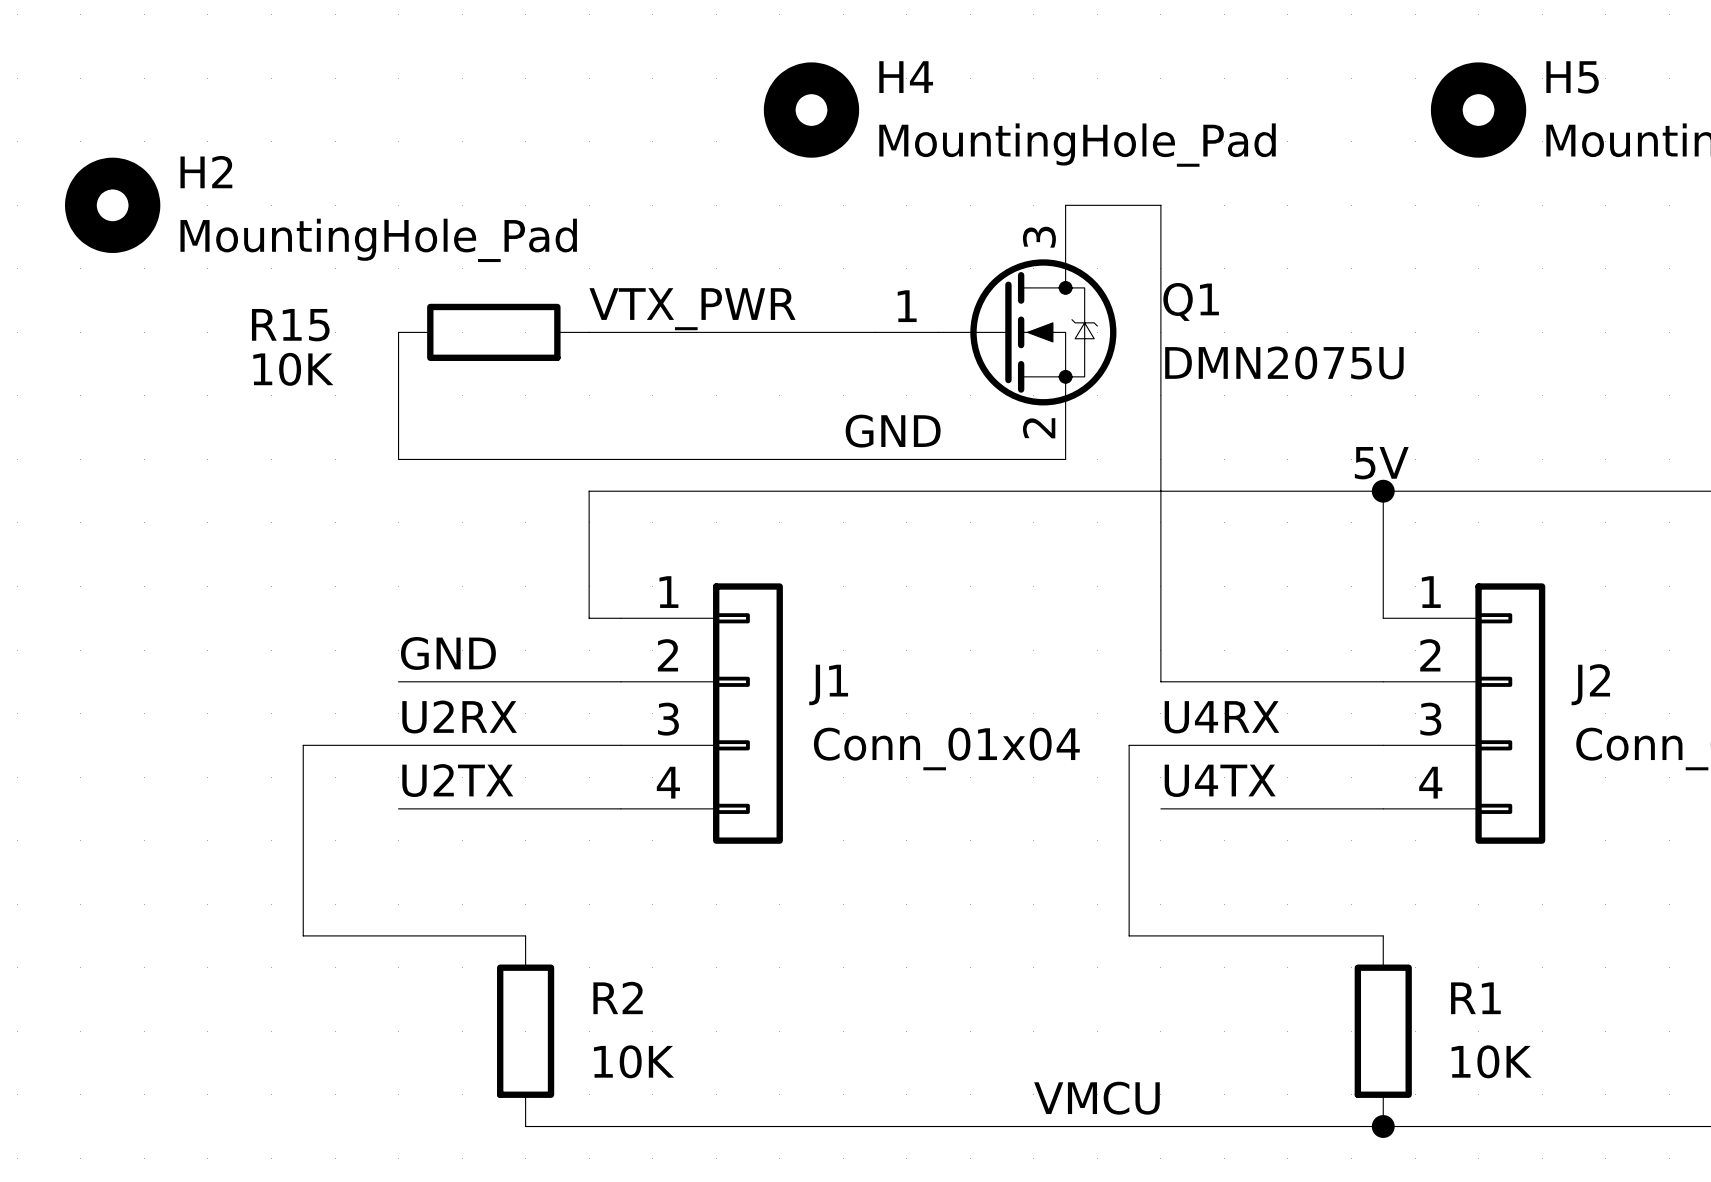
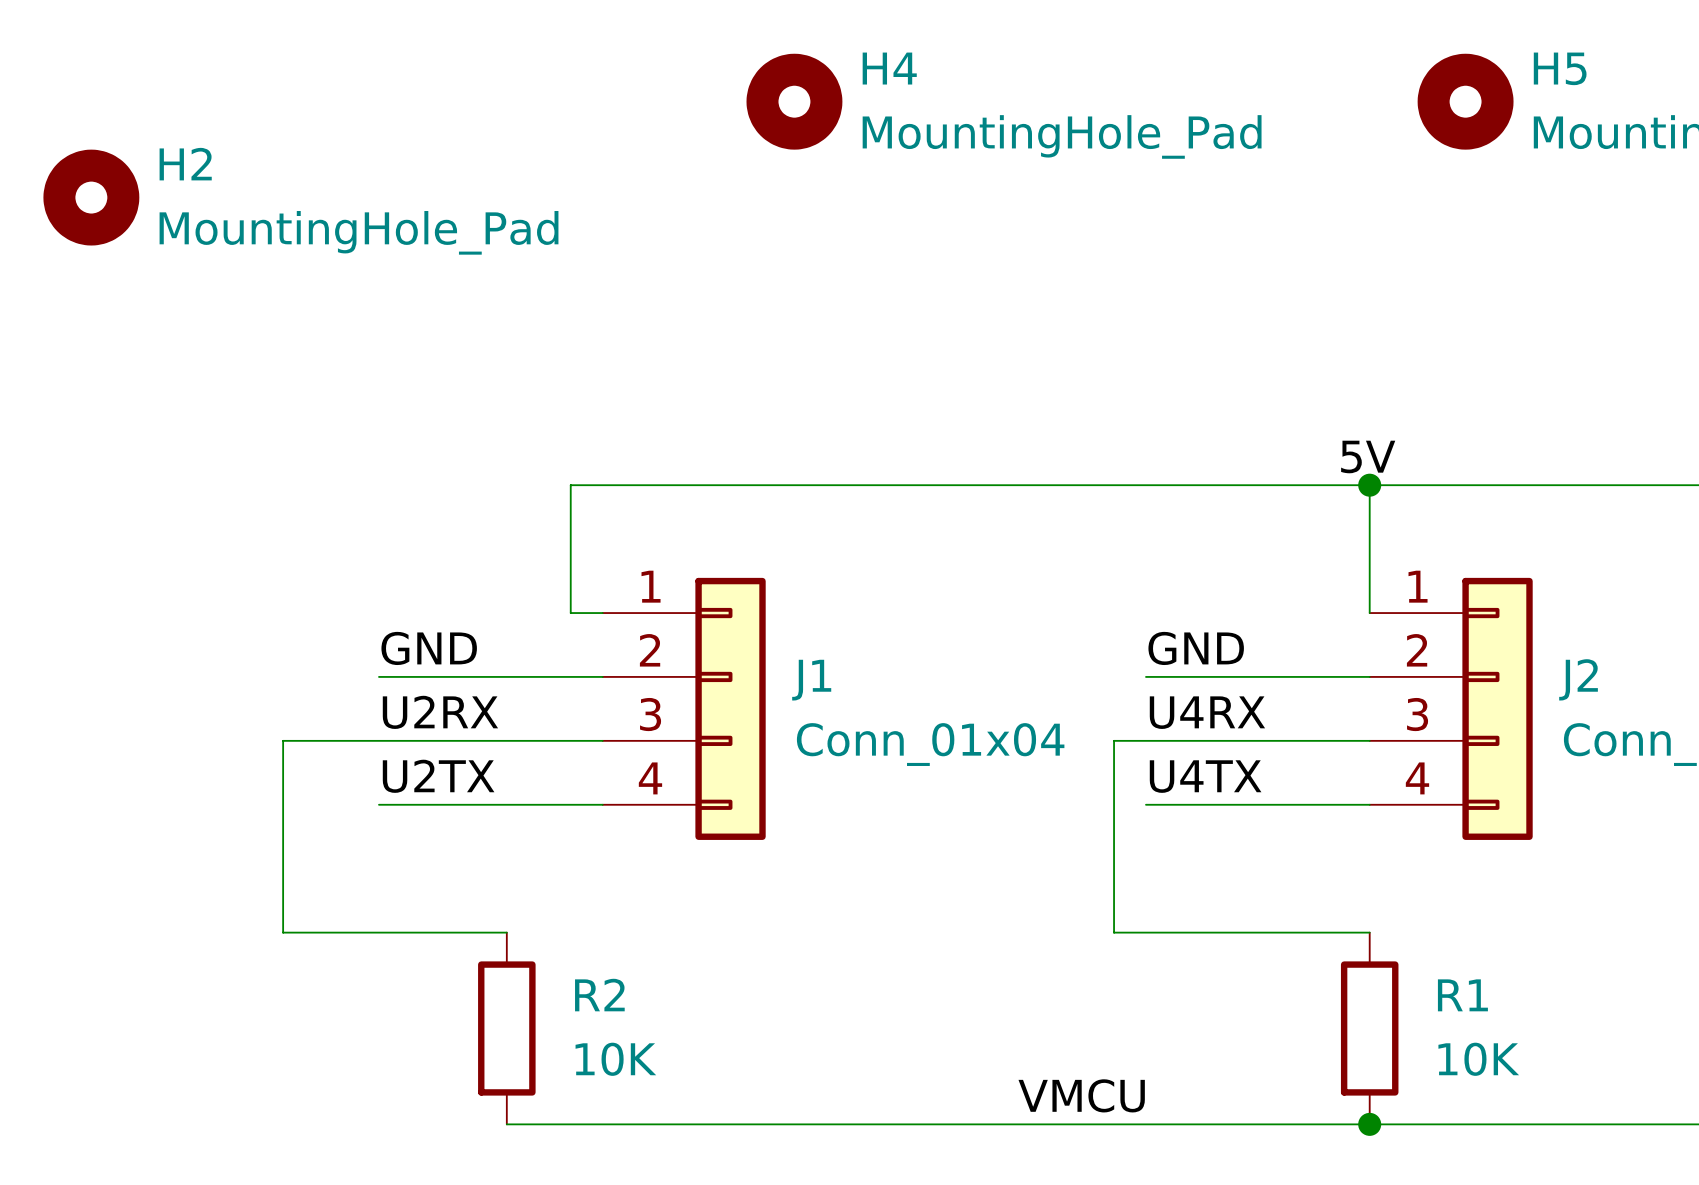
wire: (1065, 205) (1160, 205) (1160, 681) -> none
label: VTX_PWR (692, 309) -> none
wire: (398, 332) (398, 459) (1065, 459) -> none
R15: 10K (493, 332) -> none
wire: (589, 332) (875, 332) -> none
Q1: DMN2075U (995, 332) -> none
label position: GND (893, 431) -> GND (1196, 648)

